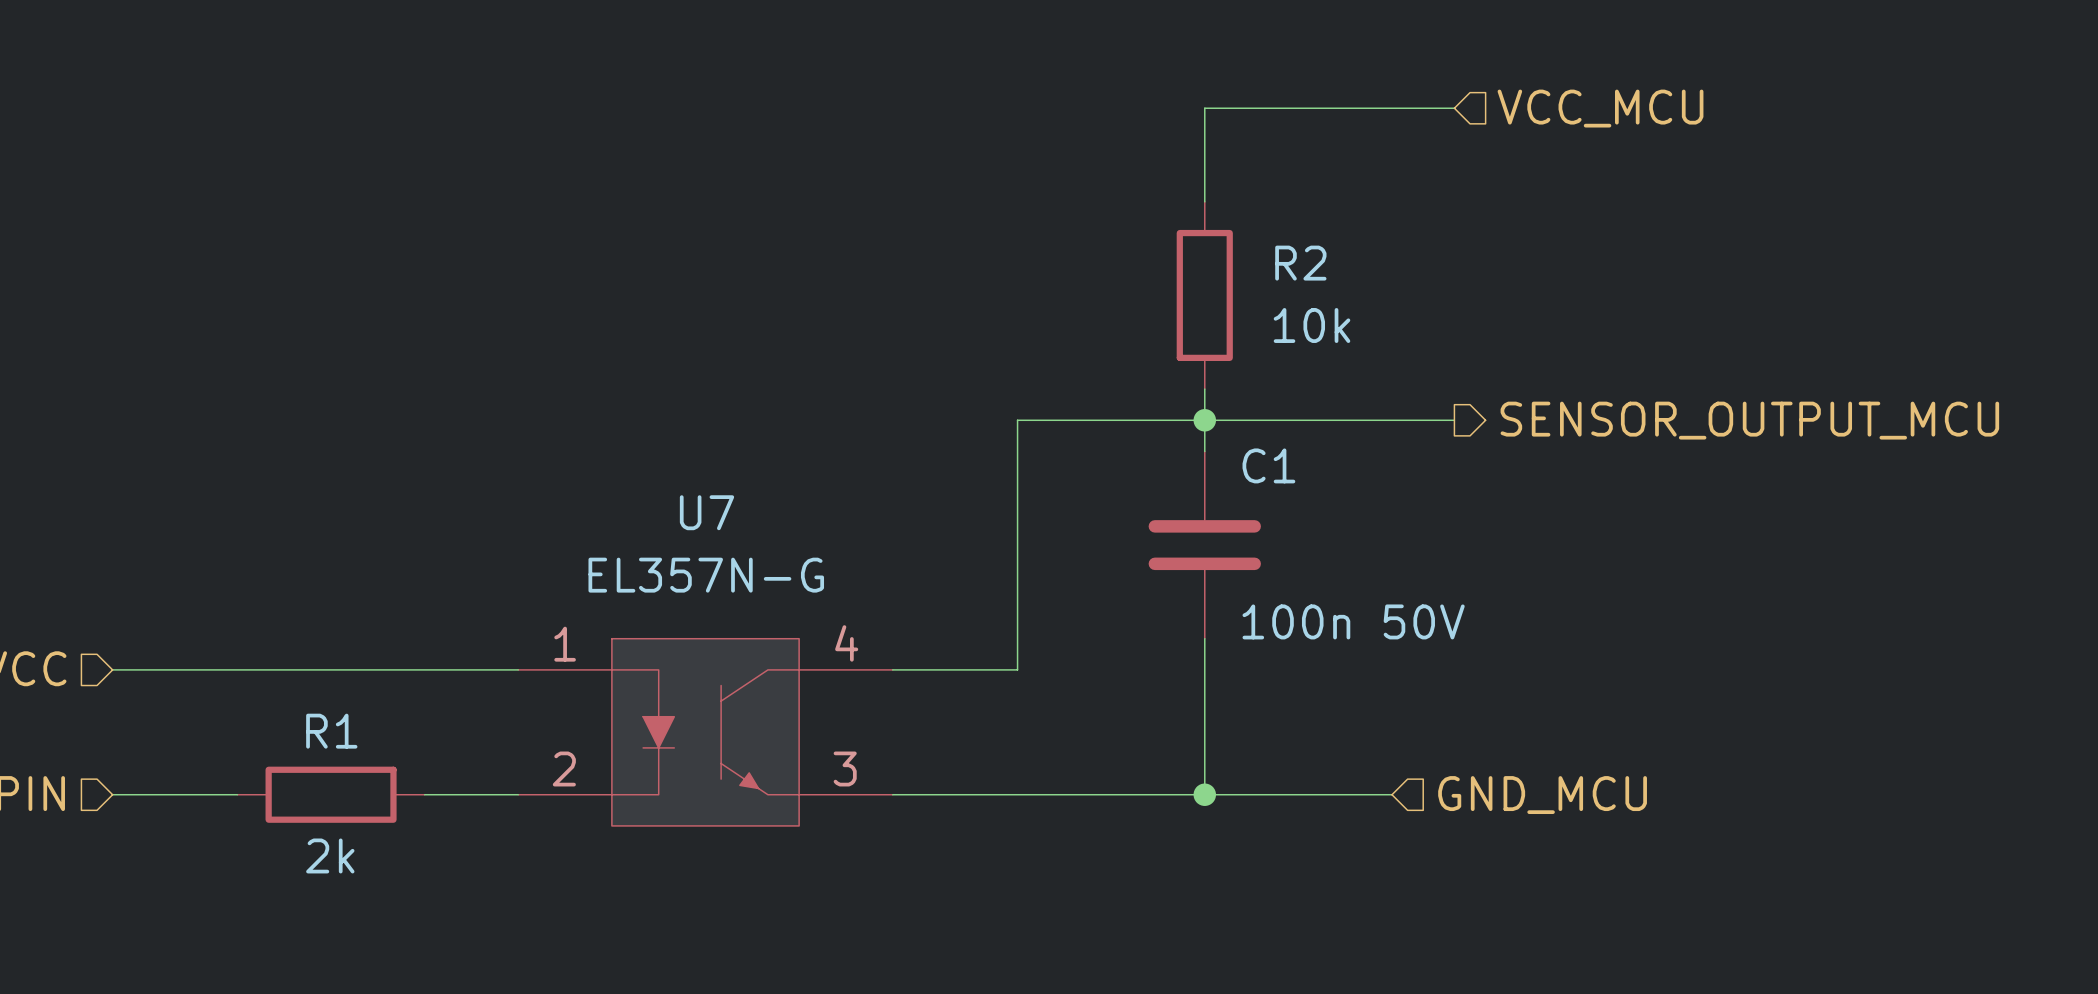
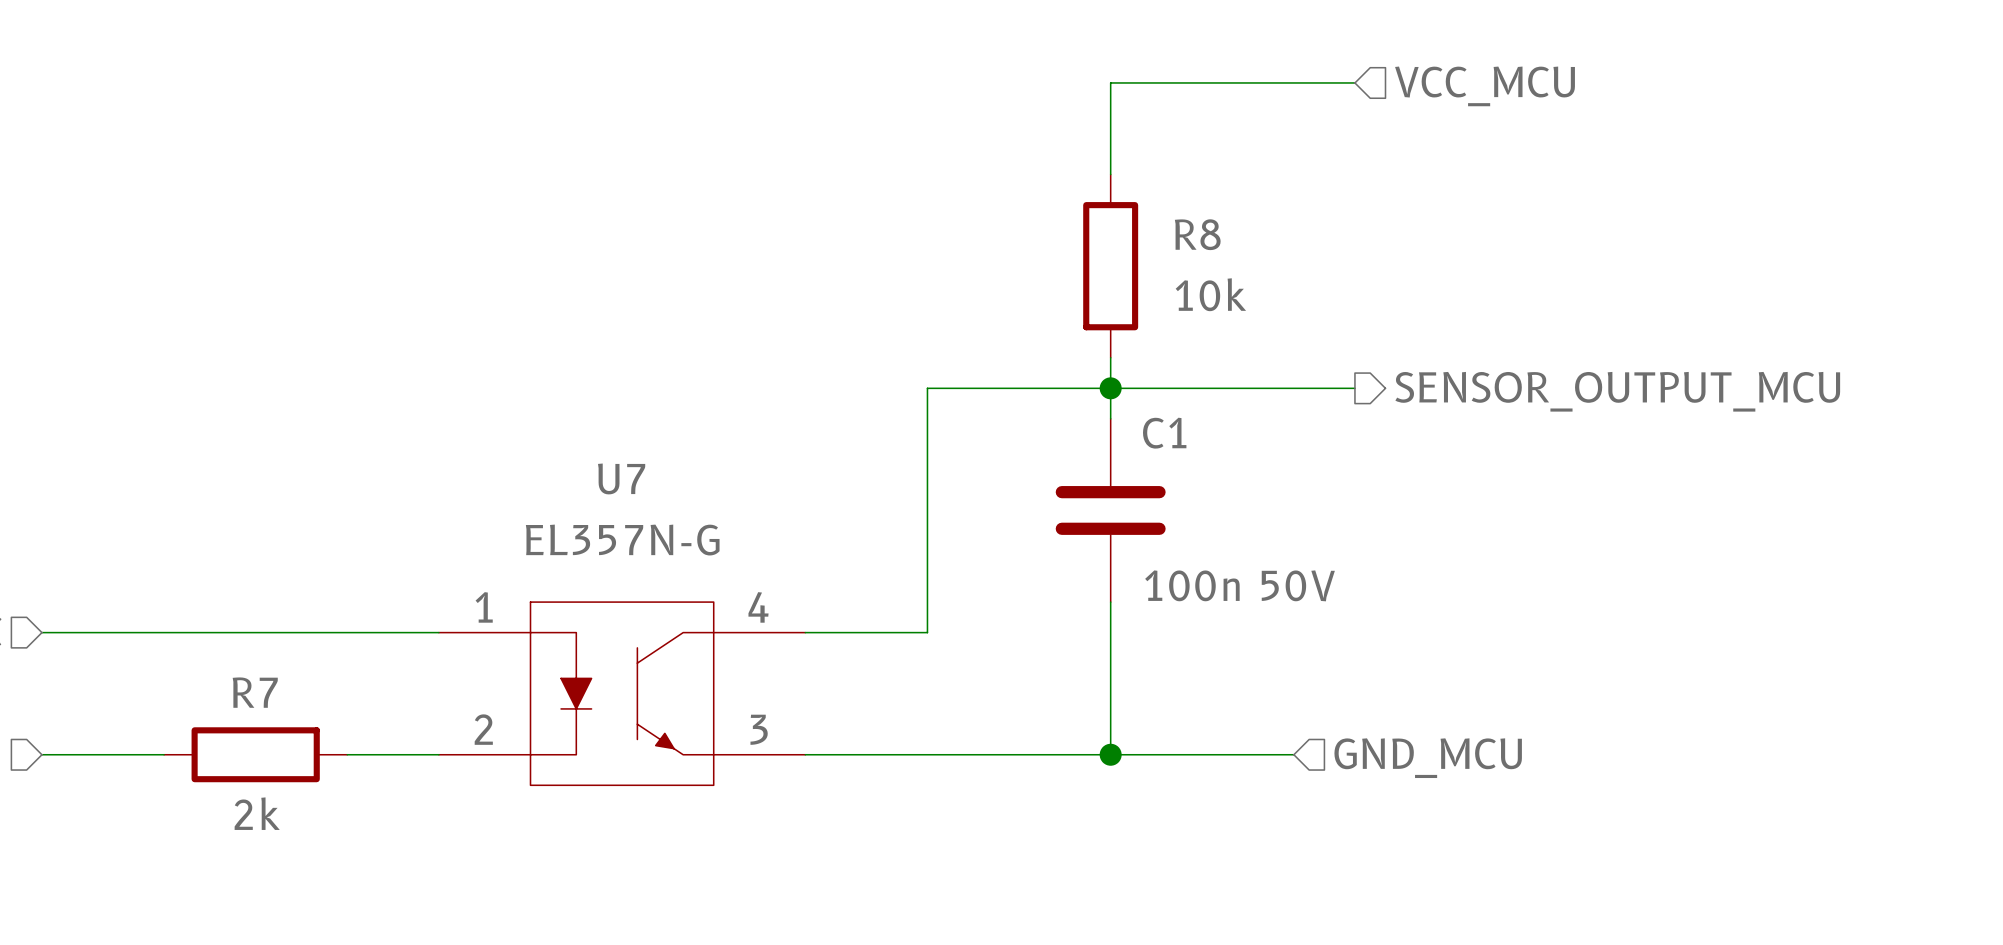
R2 name: R2 (1300, 263) -> R8 (1197, 234)
R1 name: R1 (331, 731) -> R7 (255, 692)

